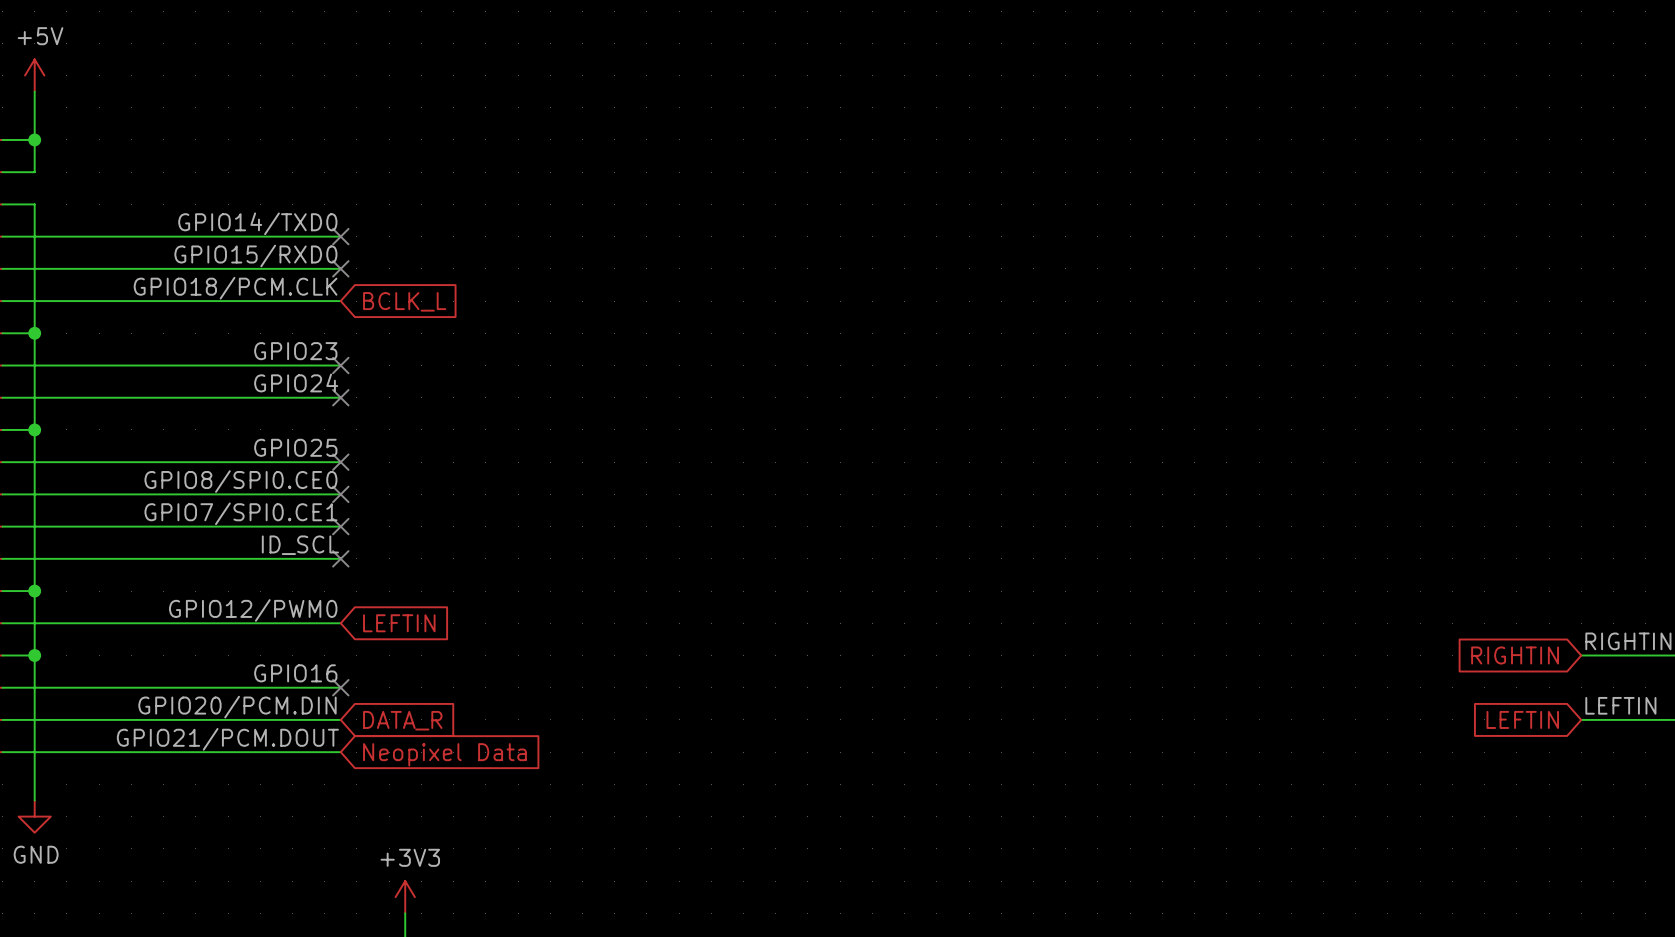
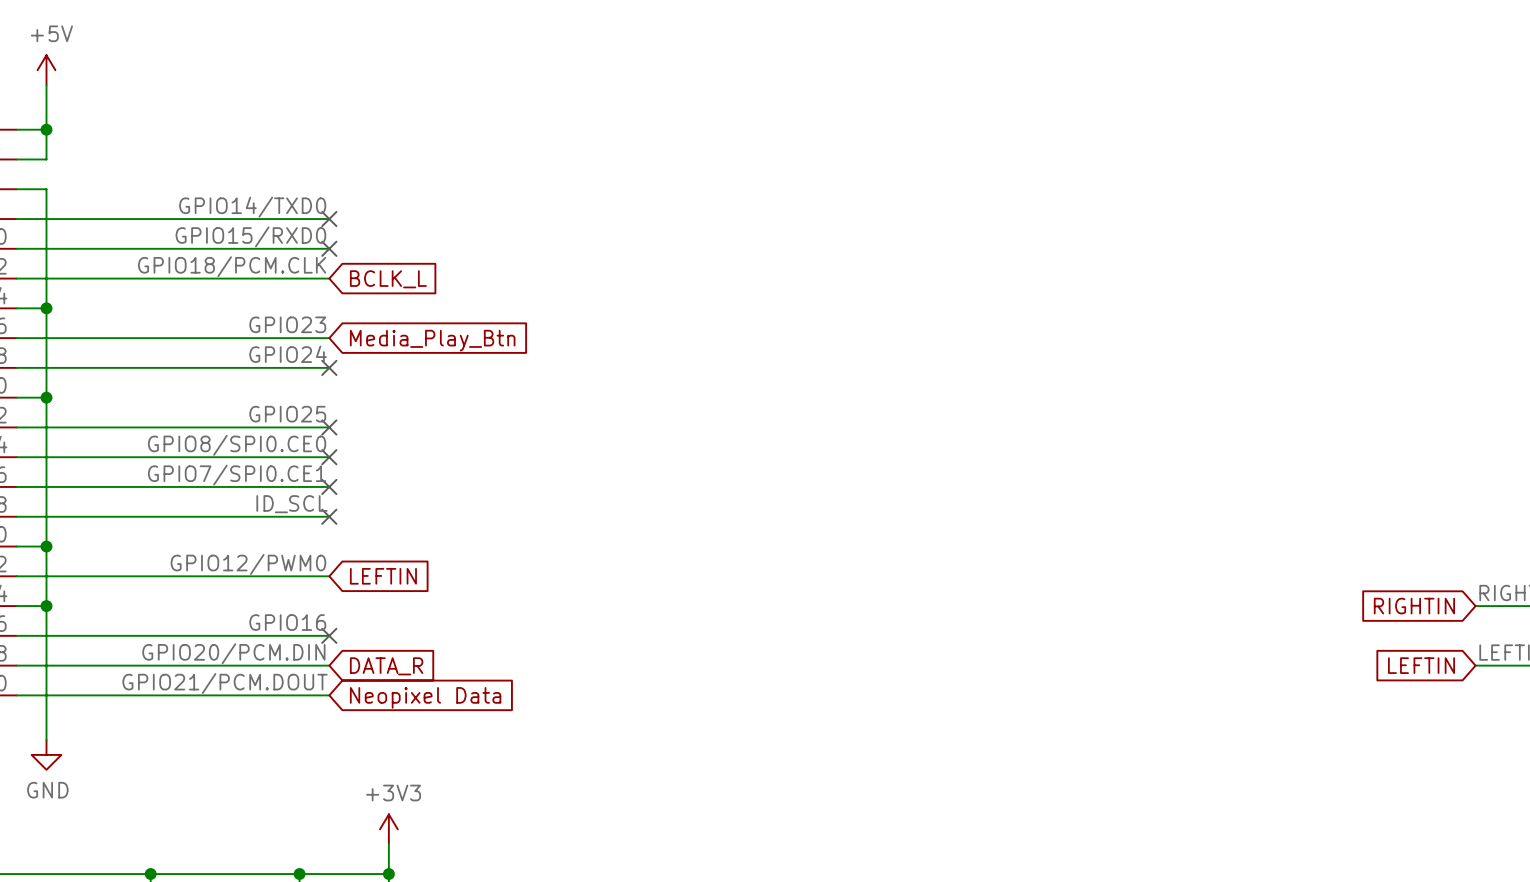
no-connect mark: (340, 365) -> none
global label: none -> Media_Play_Btn (432, 340)

